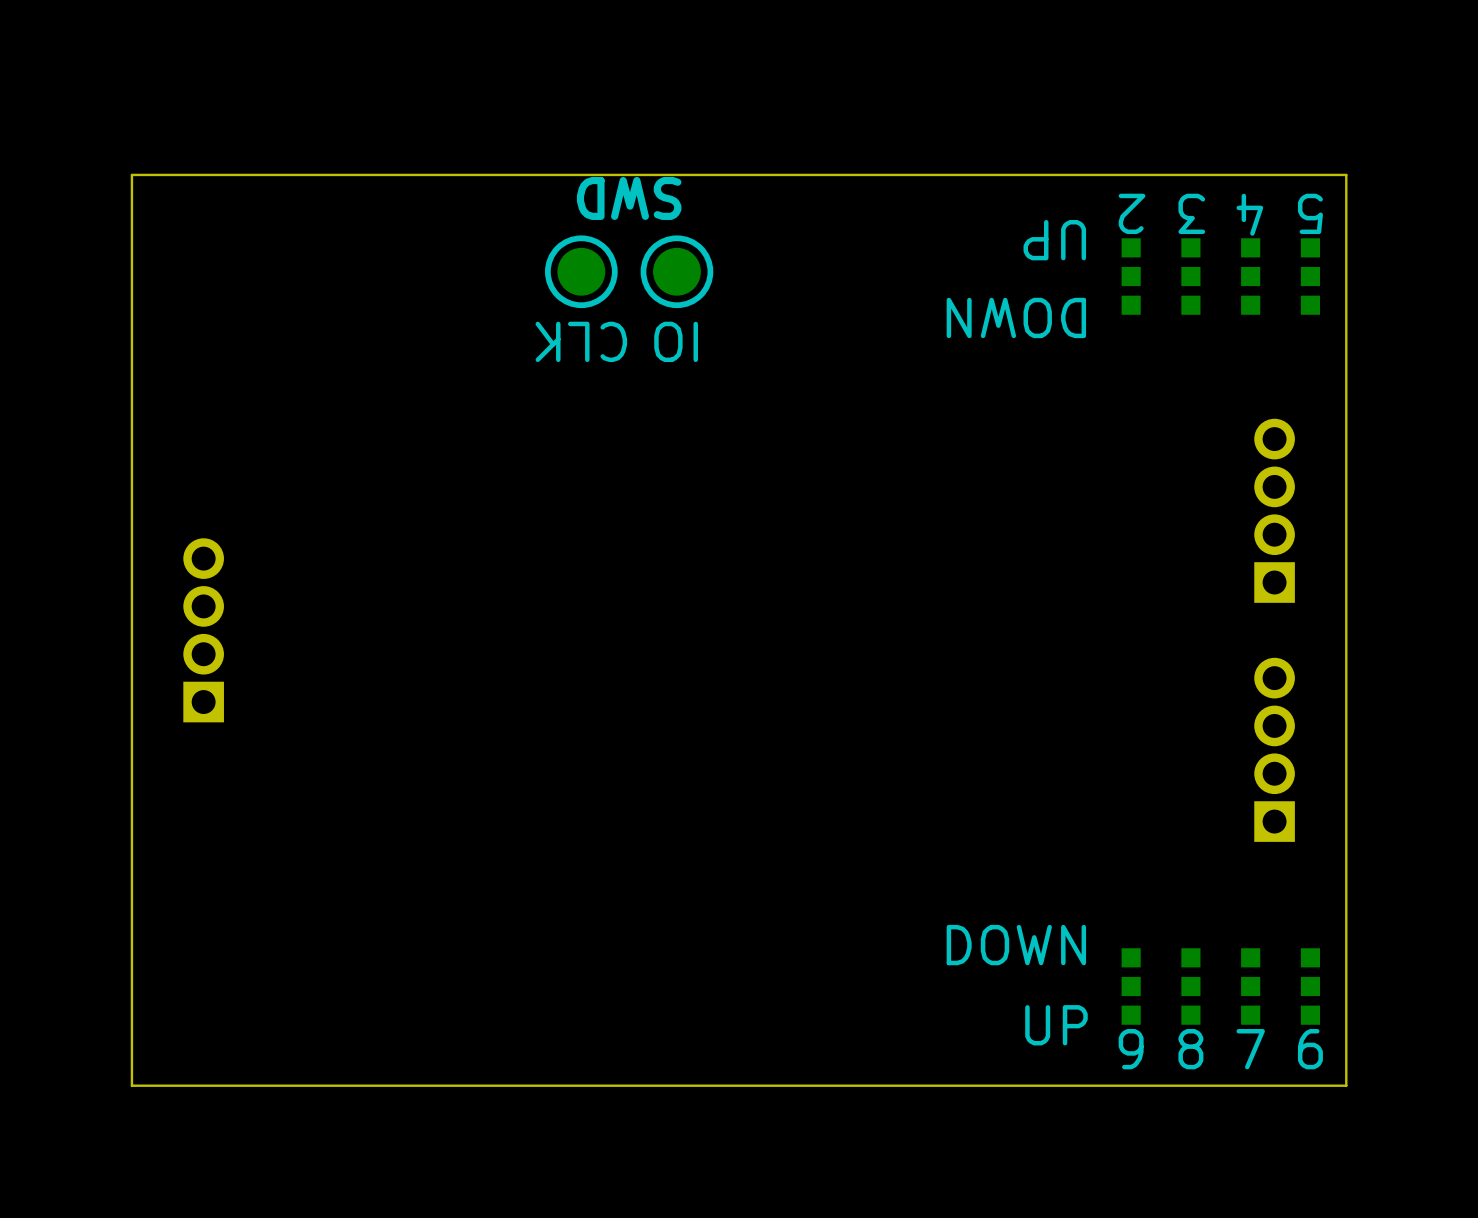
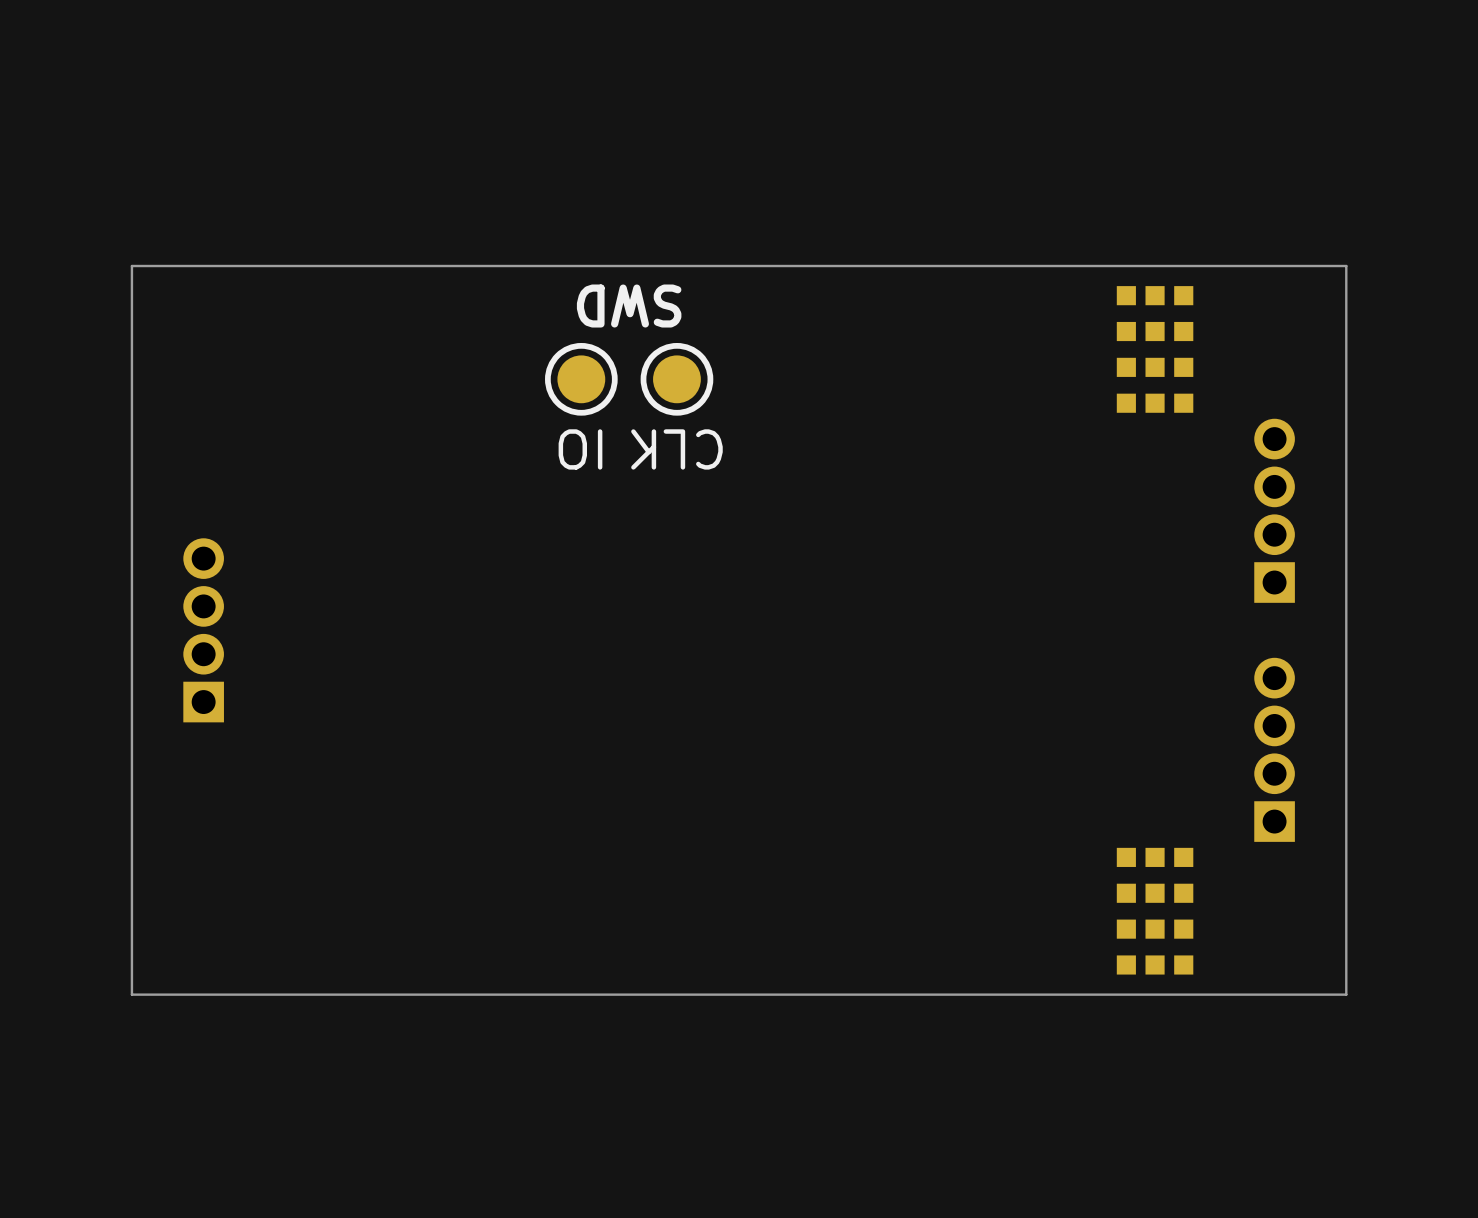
text position: SWD (629, 198) -> SWD (629, 306)
text: 2 (1132, 213) -> none
text: 3 (1191, 213) -> none
text: 5 (1310, 213) -> none
text: 4 (1249, 214) -> none
text: UP (1054, 240) -> none
board edge: (1346, 266) (1346, 174) (131, 174) (131, 266) -> (1346, 266) (131, 266)
part: (581, 271) -> none
part: (676, 271) -> none
part: (1131, 276) -> none
part: (1190, 276) -> none
part: (1250, 276) -> none
part: (1310, 276) -> none
part: none -> (1155, 295)
text: DOWN (1016, 317) -> none
part: none -> (1155, 331)
text position: CLK (581, 341) -> CLK (676, 449)
text position: IO (676, 341) -> IO (580, 449)
part: none -> (1155, 367)
part: none -> (581, 379)
part: none -> (676, 379)
part: none -> (1155, 403)
part: none -> (1155, 857)
part: none -> (1155, 893)
part: none -> (1155, 929)
text: DOWN (1016, 945) -> none
part: none -> (1155, 964)
part: (1131, 986) -> none
part: (1190, 986) -> none
part: (1250, 986) -> none
part: (1310, 986) -> none
board edge: (1346, 994) (1346, 1085) (131, 1085) (131, 994) -> (1346, 994) (131, 994)
text: UP (1056, 1025) -> none
text: 9 (1131, 1049) -> none
text: 8 (1190, 1049) -> none
text: 7 (1250, 1049) -> none
text: 6 (1310, 1049) -> none

